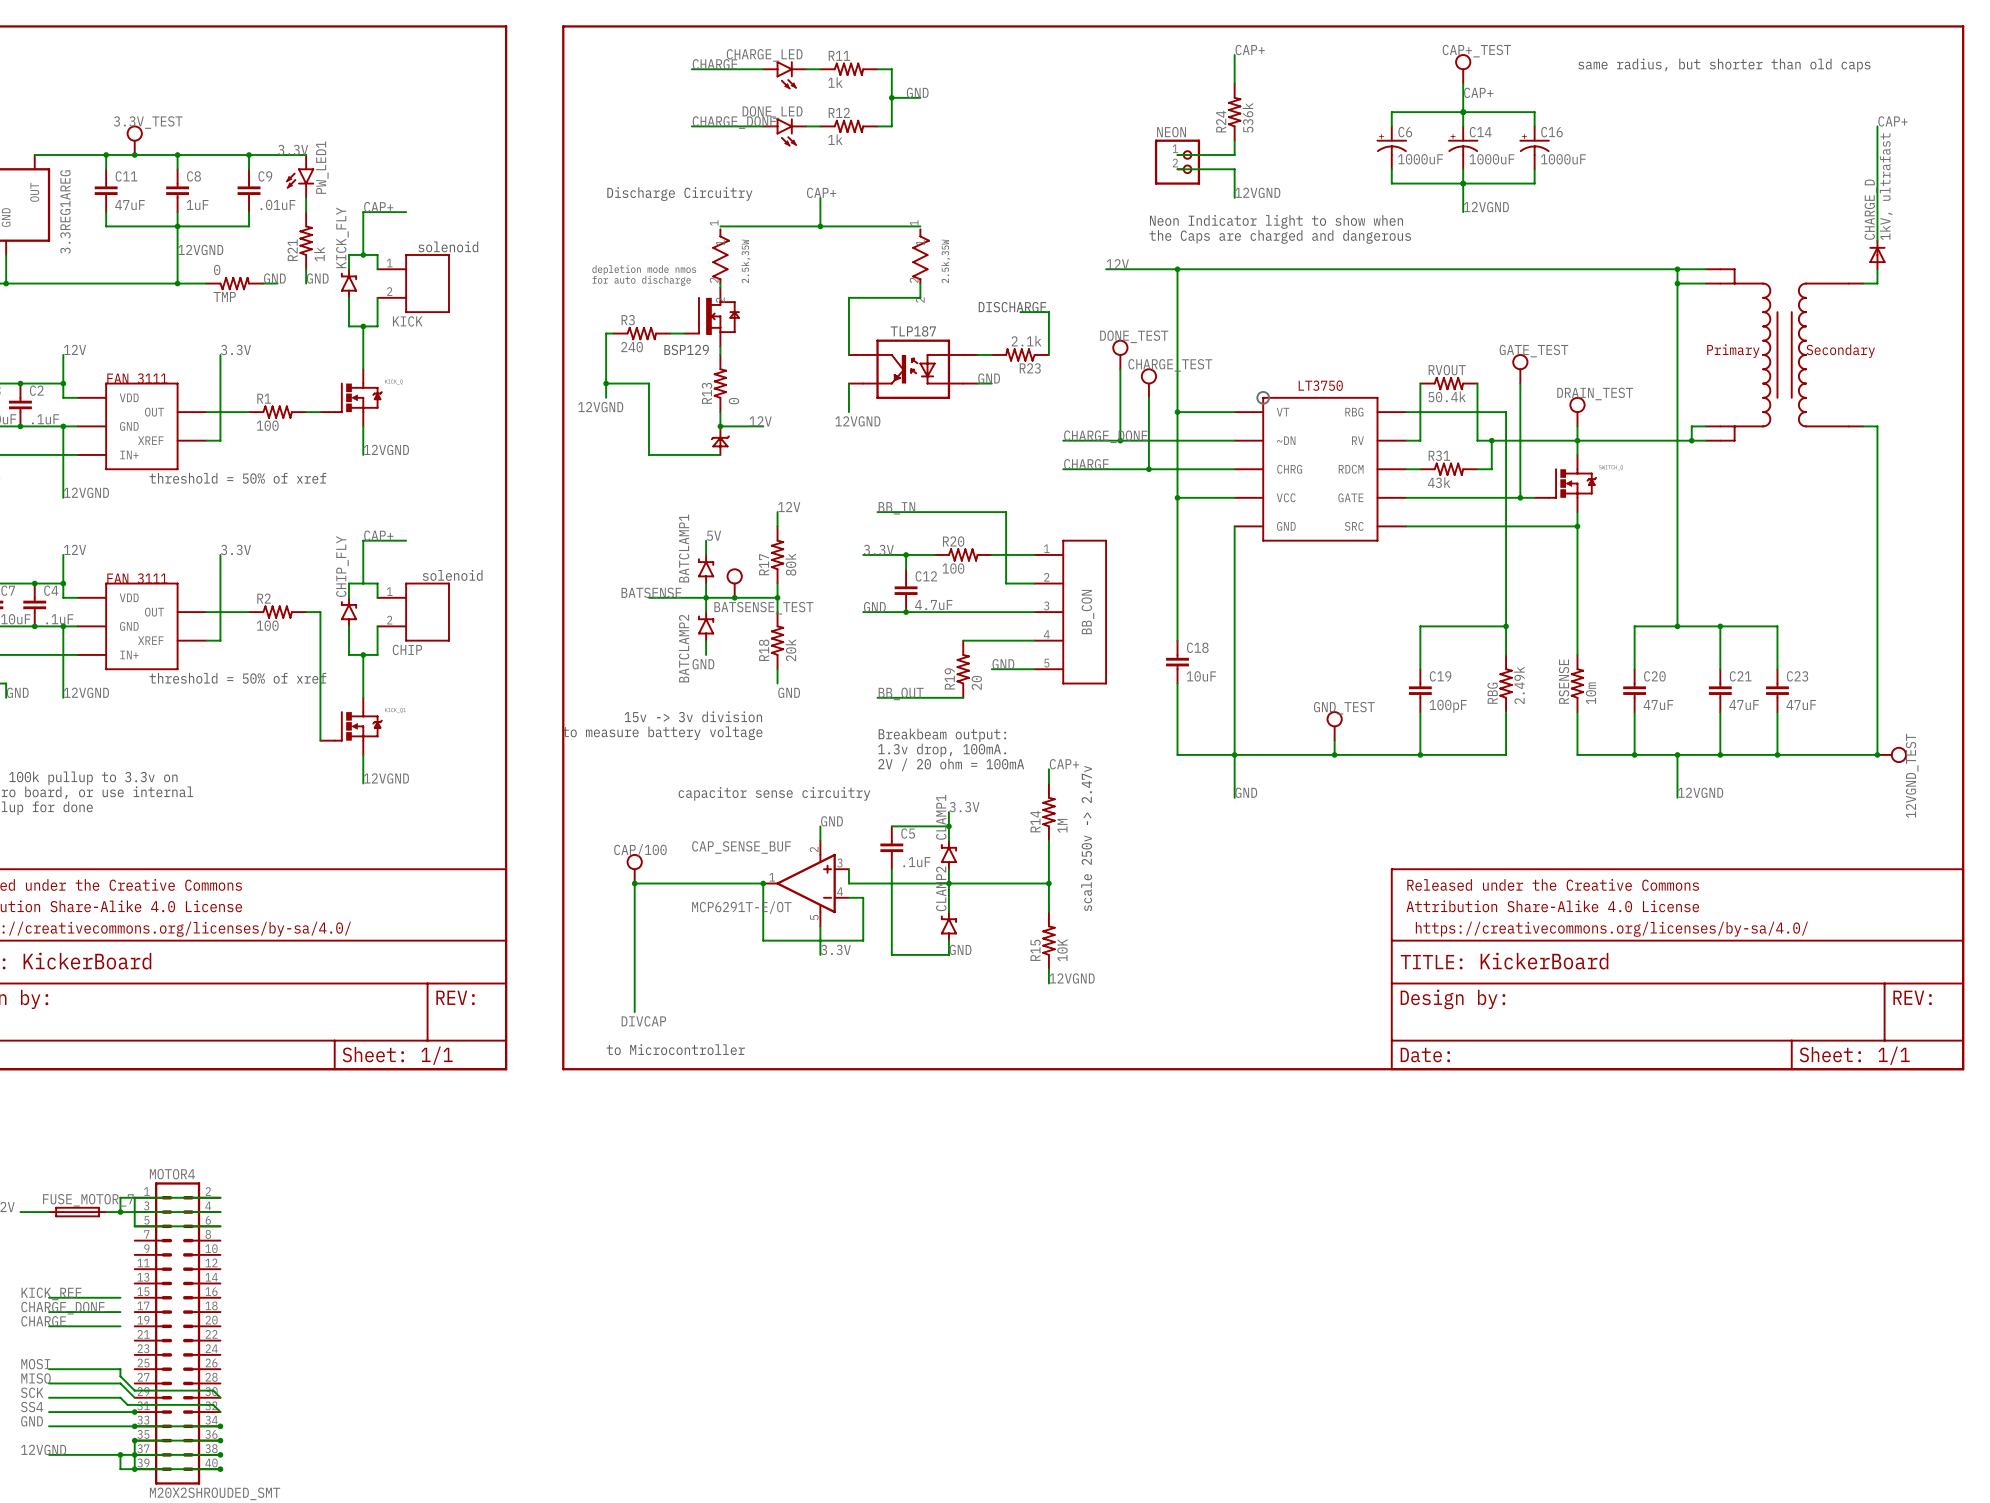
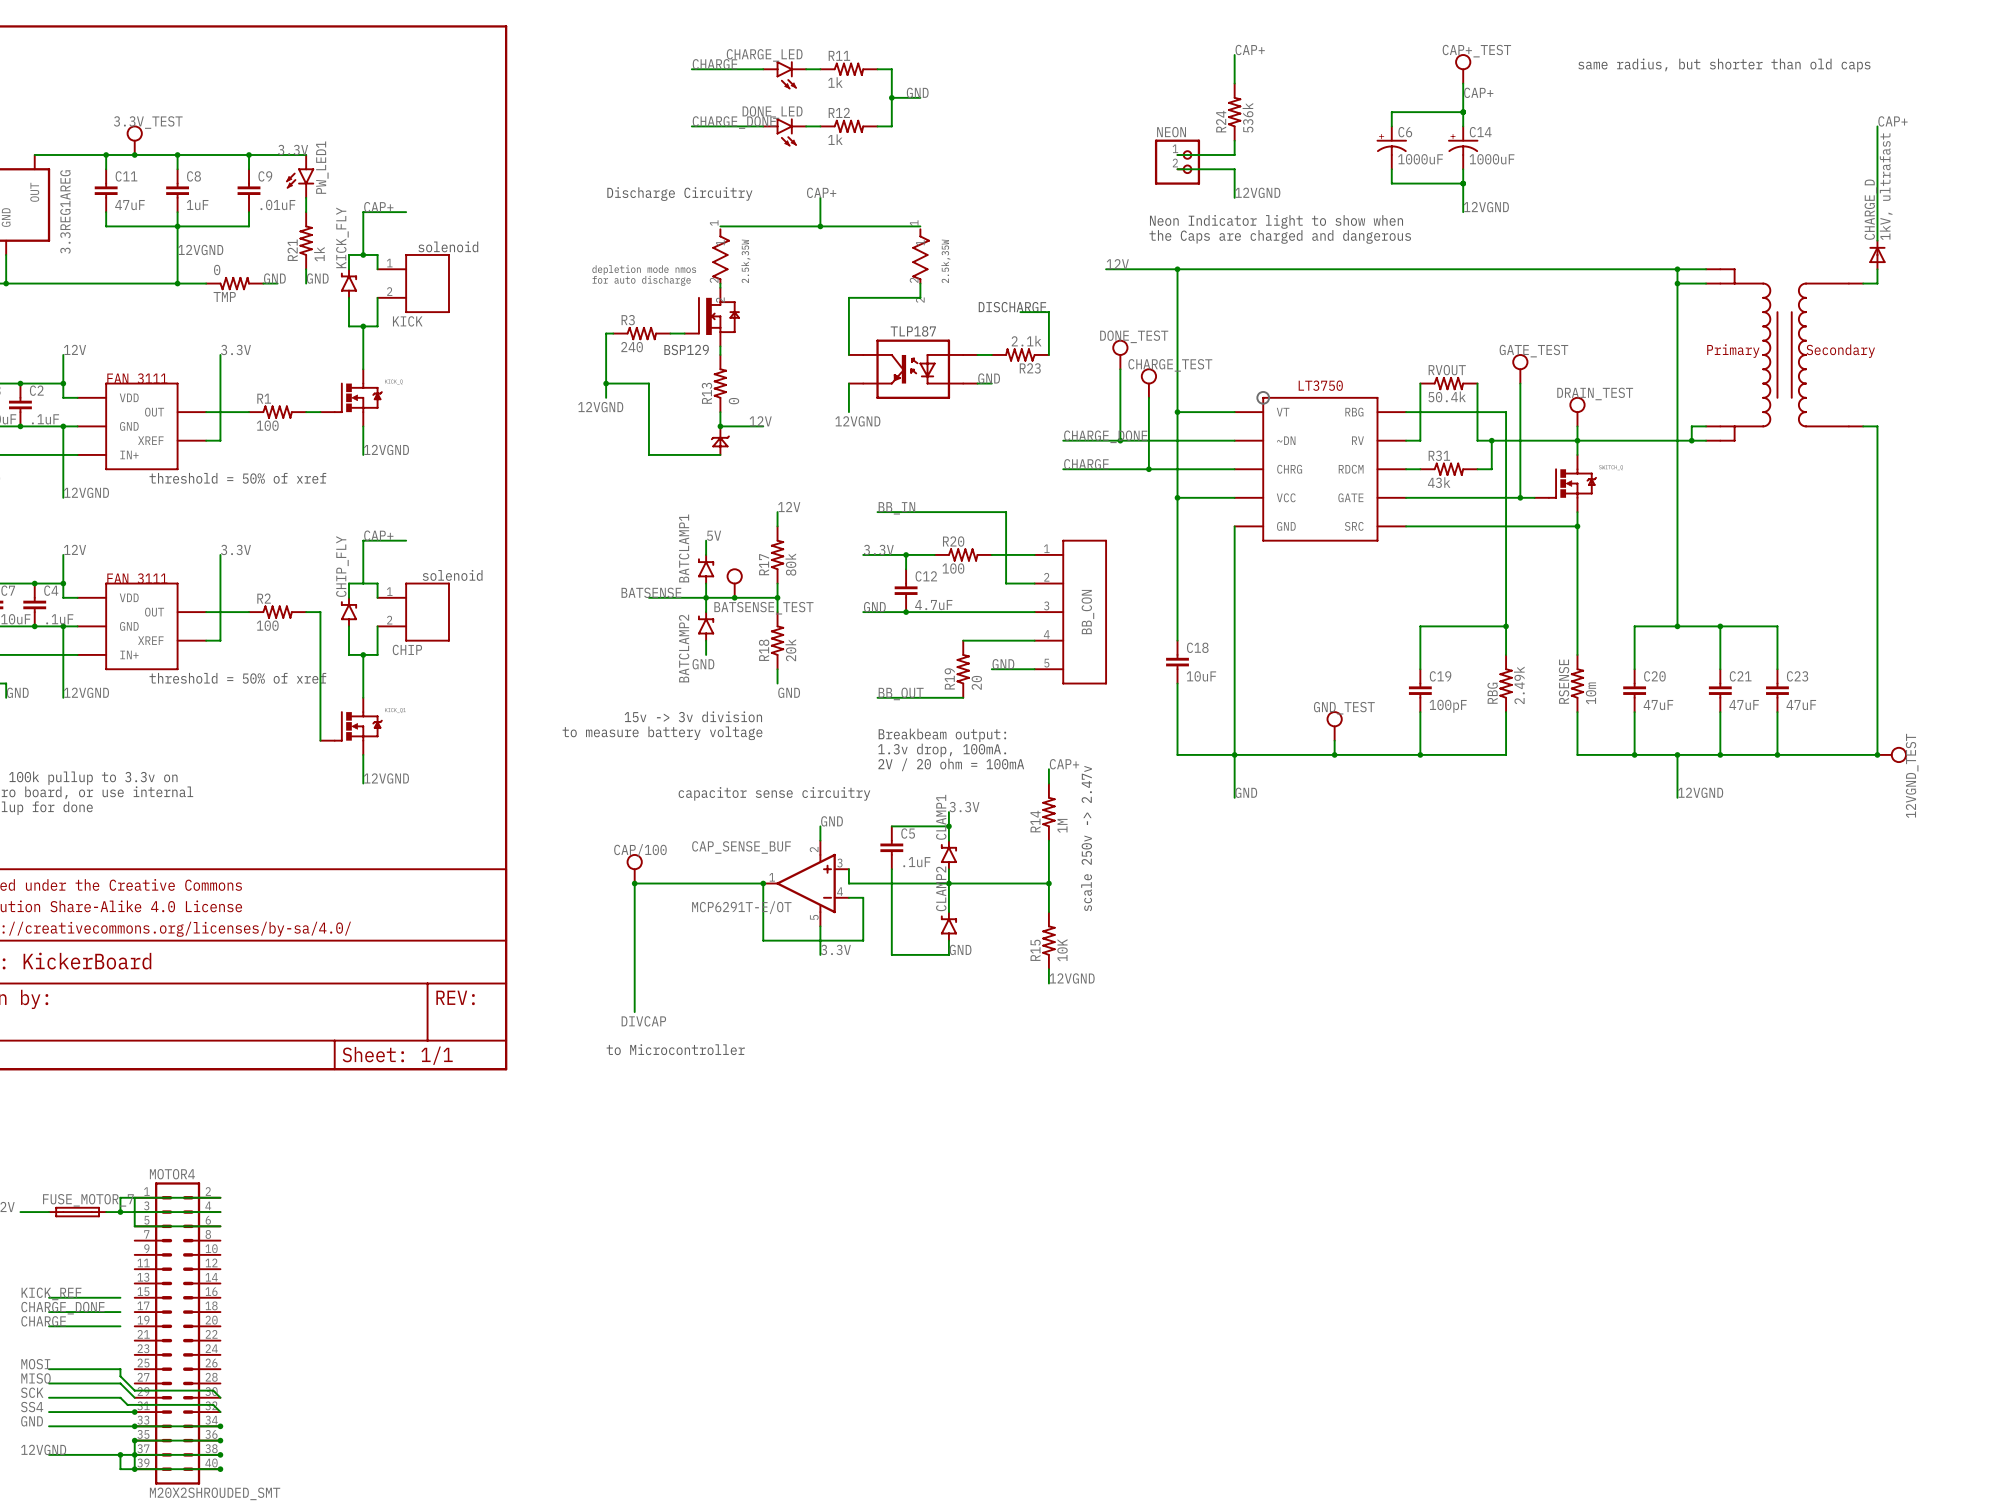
wire: (1463, 112) (1534, 112) (1534, 126) -> none
C16: 1000uF (1534, 147) -> none
wire: (1534, 169) (1534, 183) (1463, 183) -> none
part: (1263, 547) -> none
part: (1677, 969) -> none

